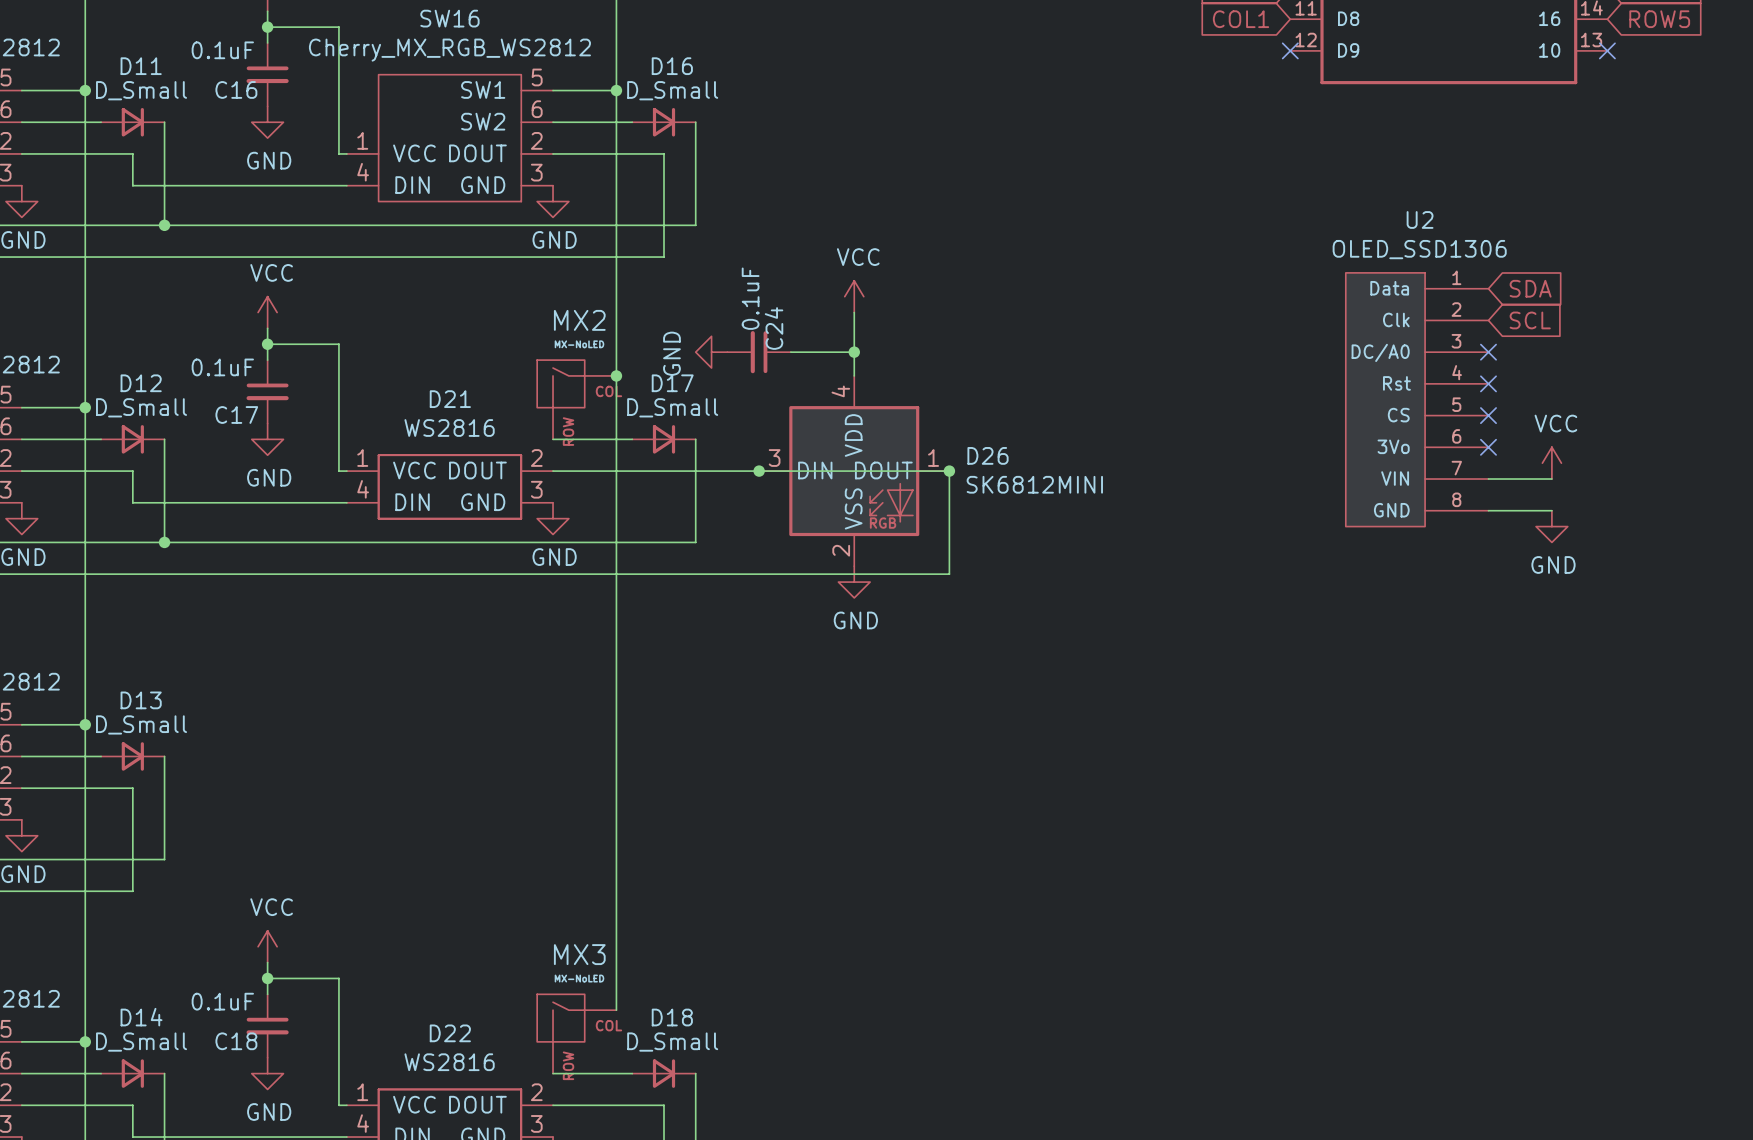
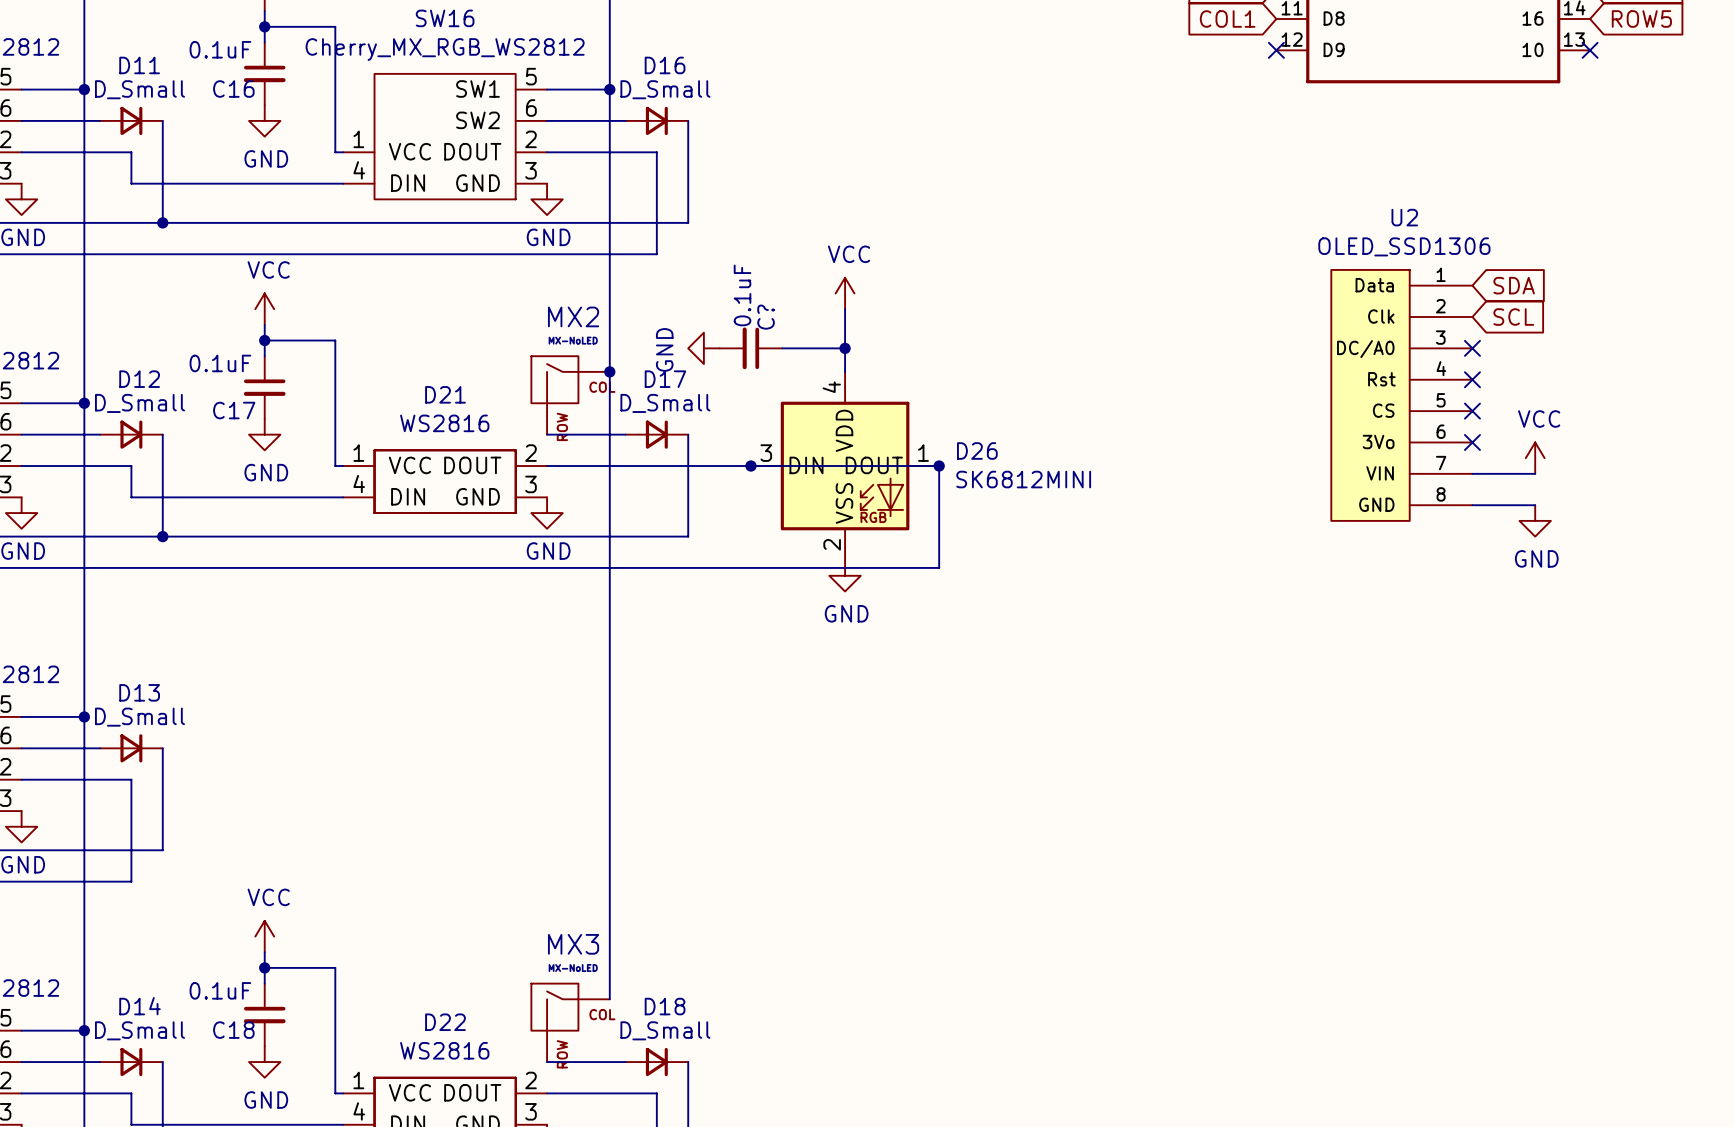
C24 name: C24 (774, 328) -> C? (766, 317)

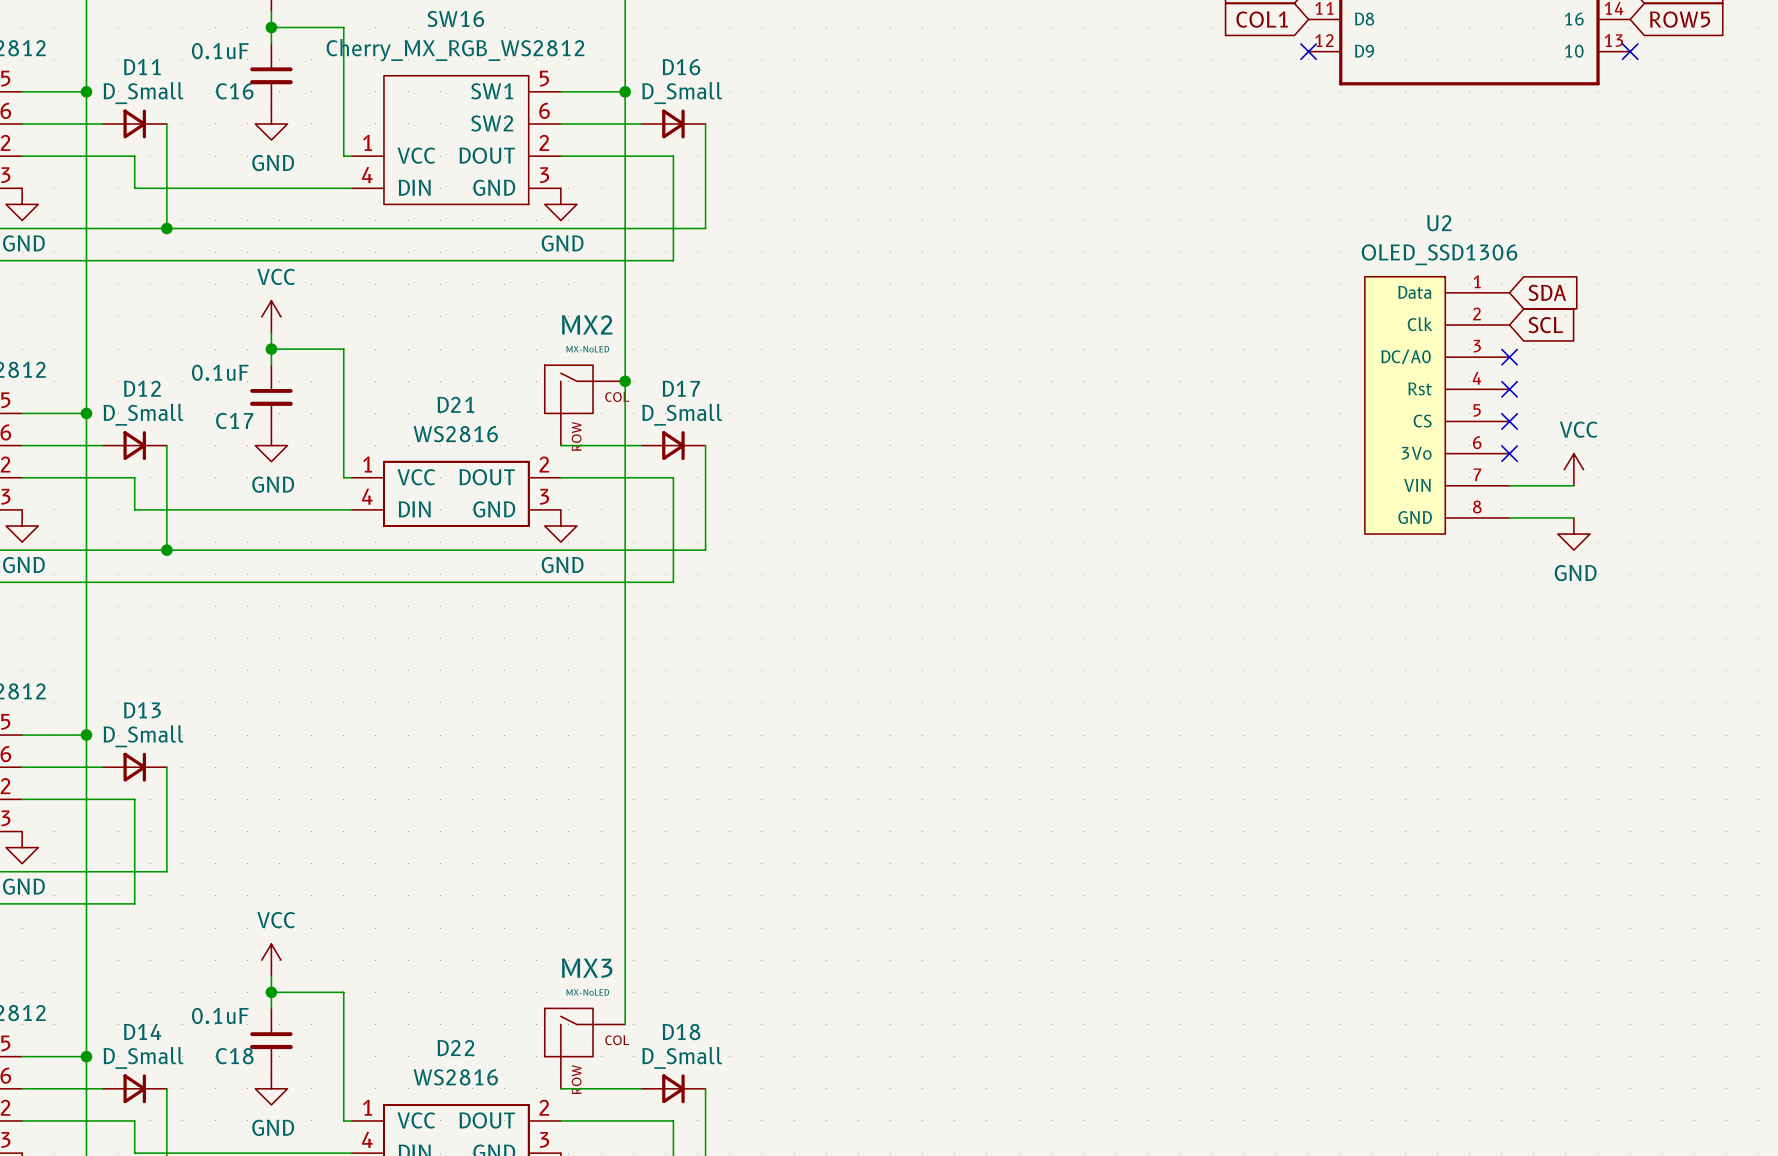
power symbol: VCC (845, 293) -> none
wire: (845, 309) (845, 371) -> none
power symbol: GND (703, 348) -> none
C?: 0.1uF (750, 348) -> none
wire: (782, 348) (845, 348) -> none
junction: (845, 348) -> none
wire: (656, 466) (939, 466) (939, 567) (656, 567) -> (673, 477) (673, 582)
junction: (750, 466) -> none
D26: SK6812MINI (845, 466) -> none
junction: (939, 466) -> none
power symbol: GND (845, 575) -> none

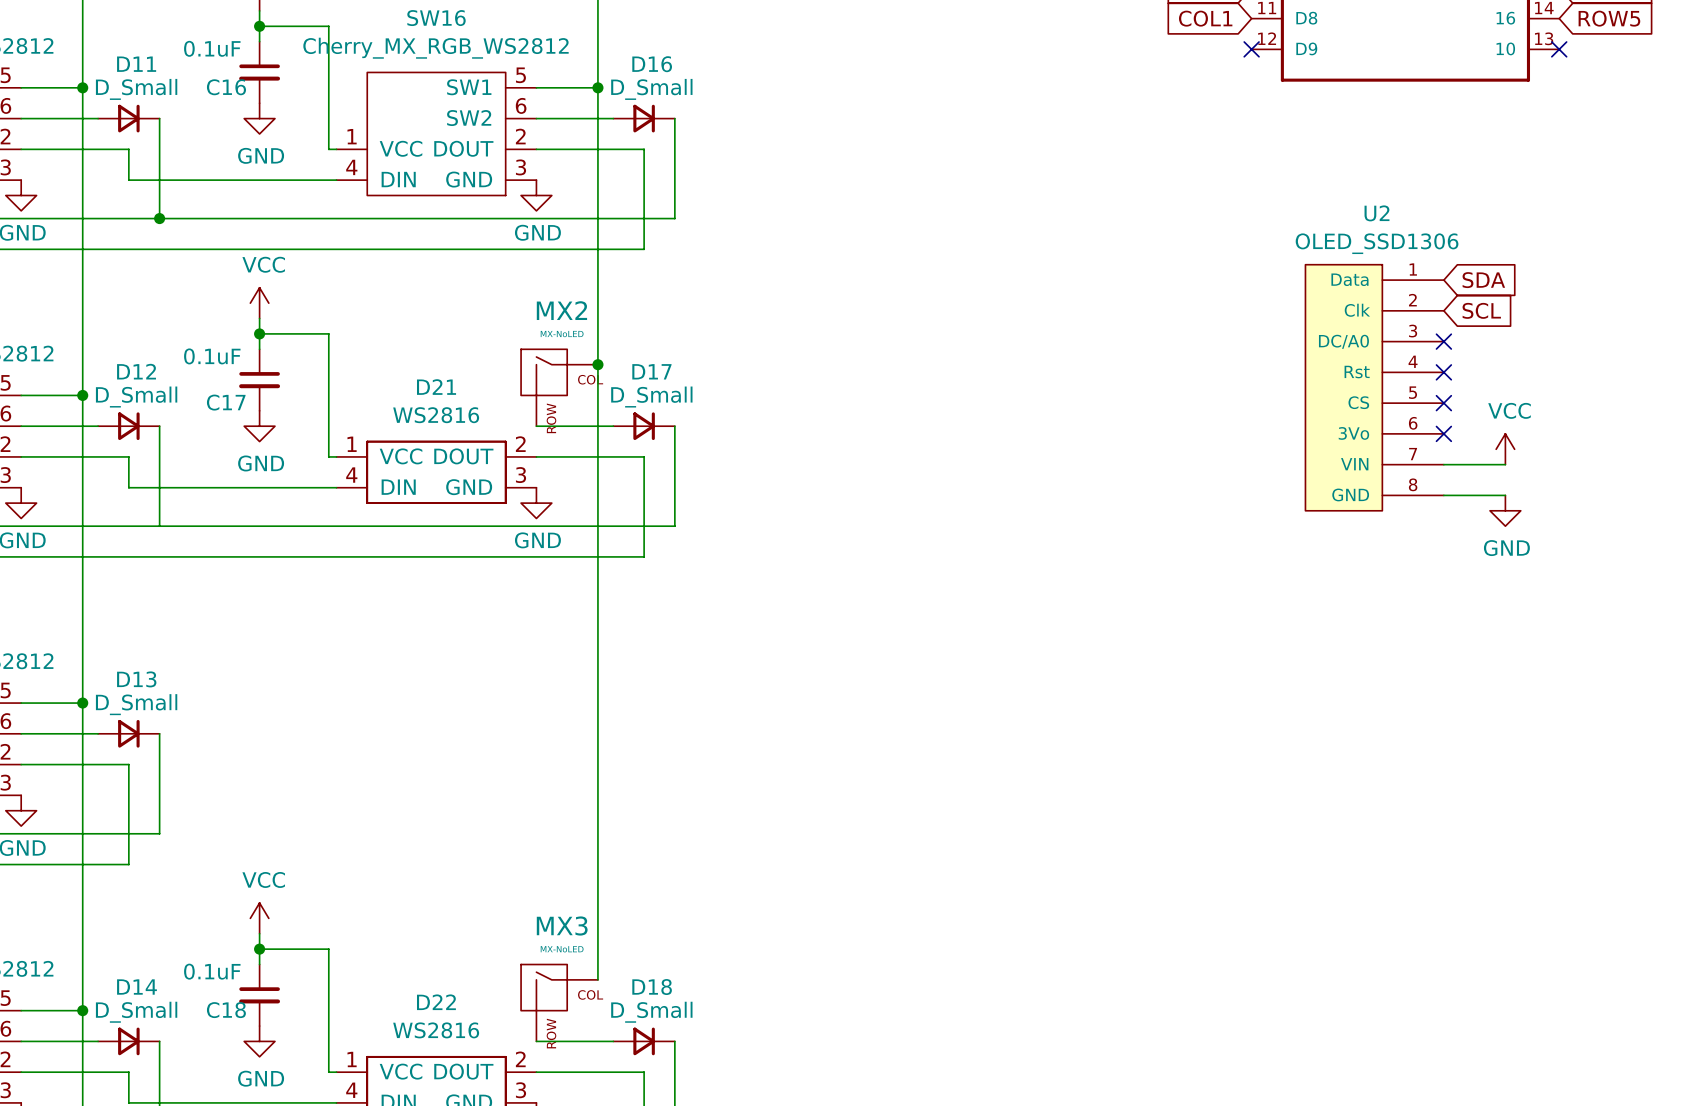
junction: (166, 550) -> none

